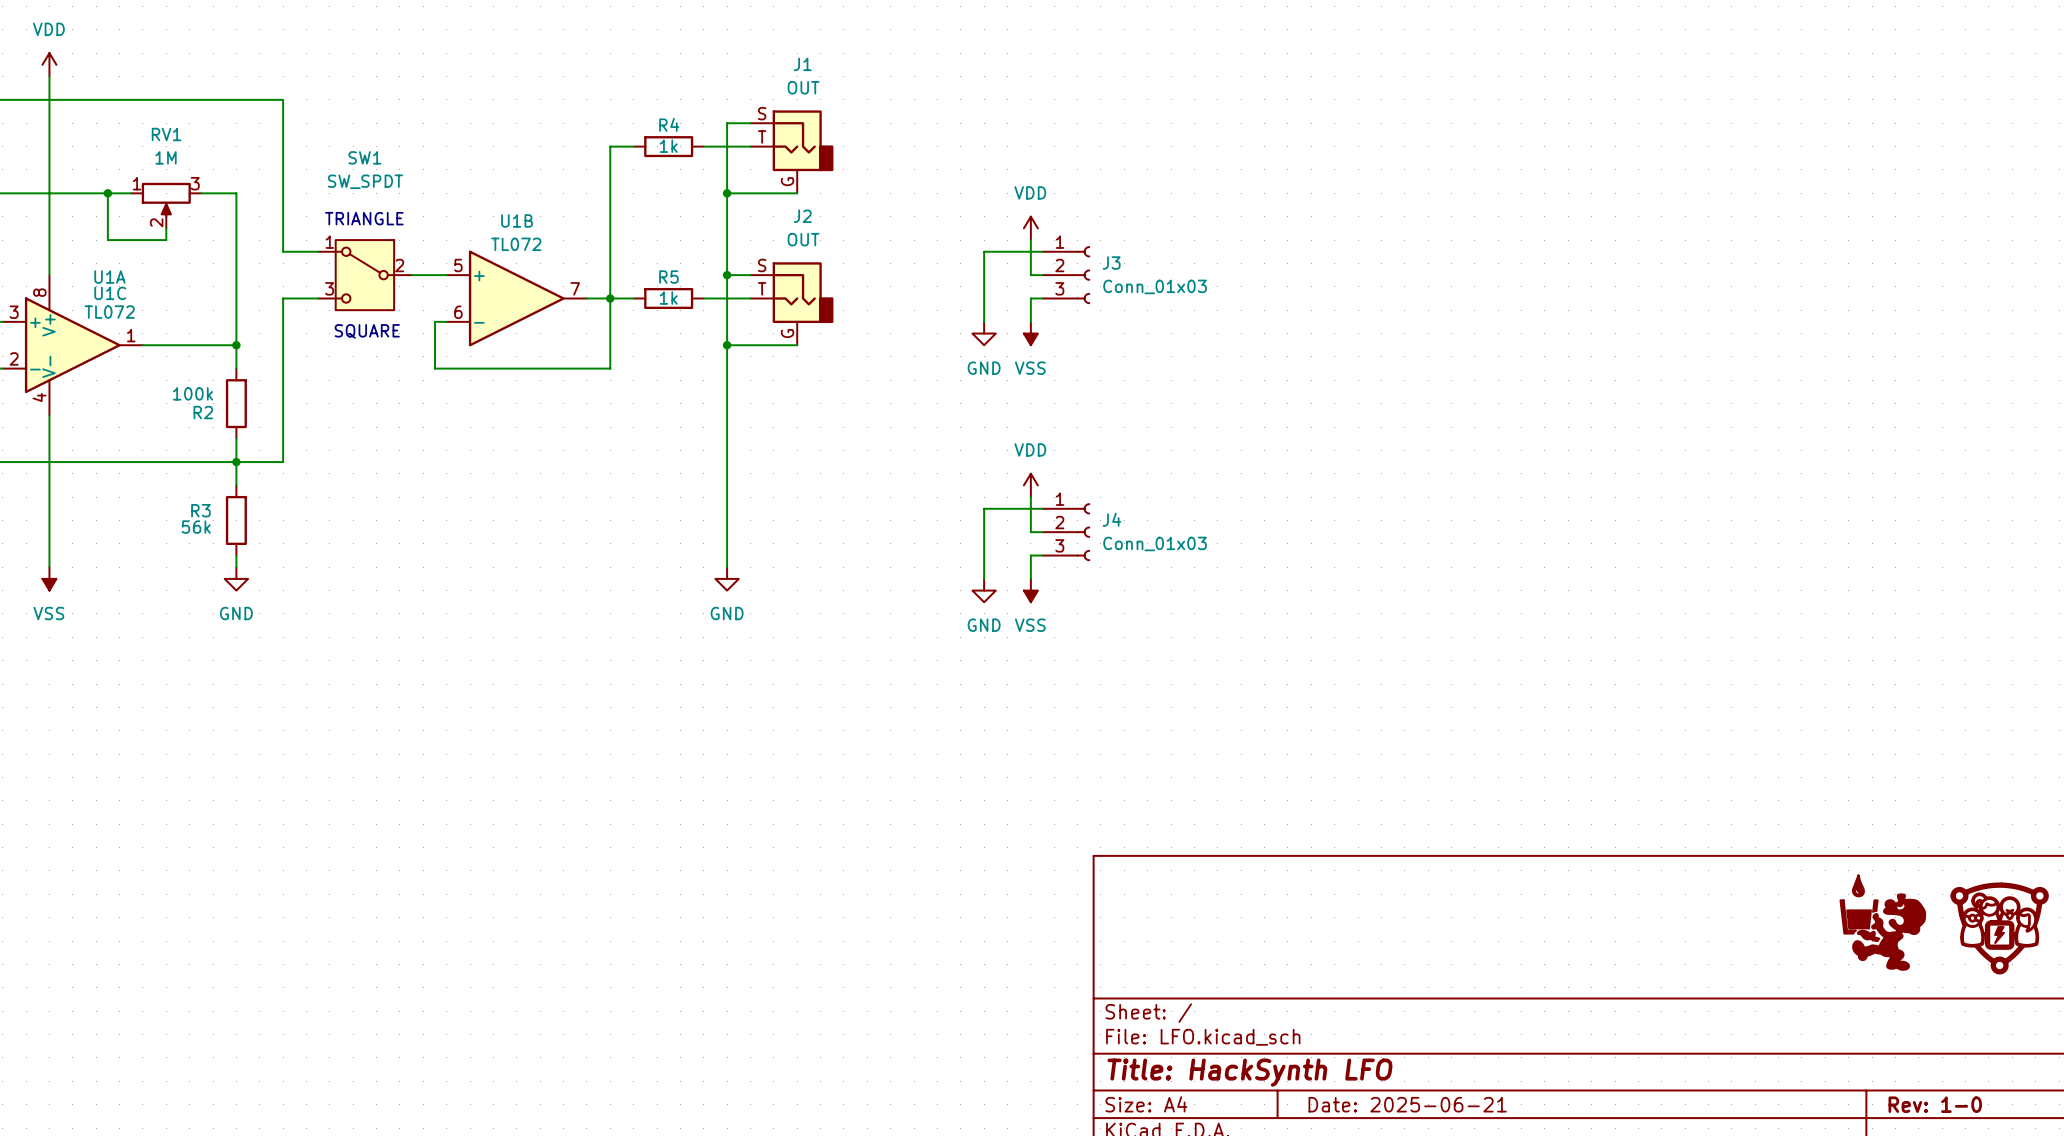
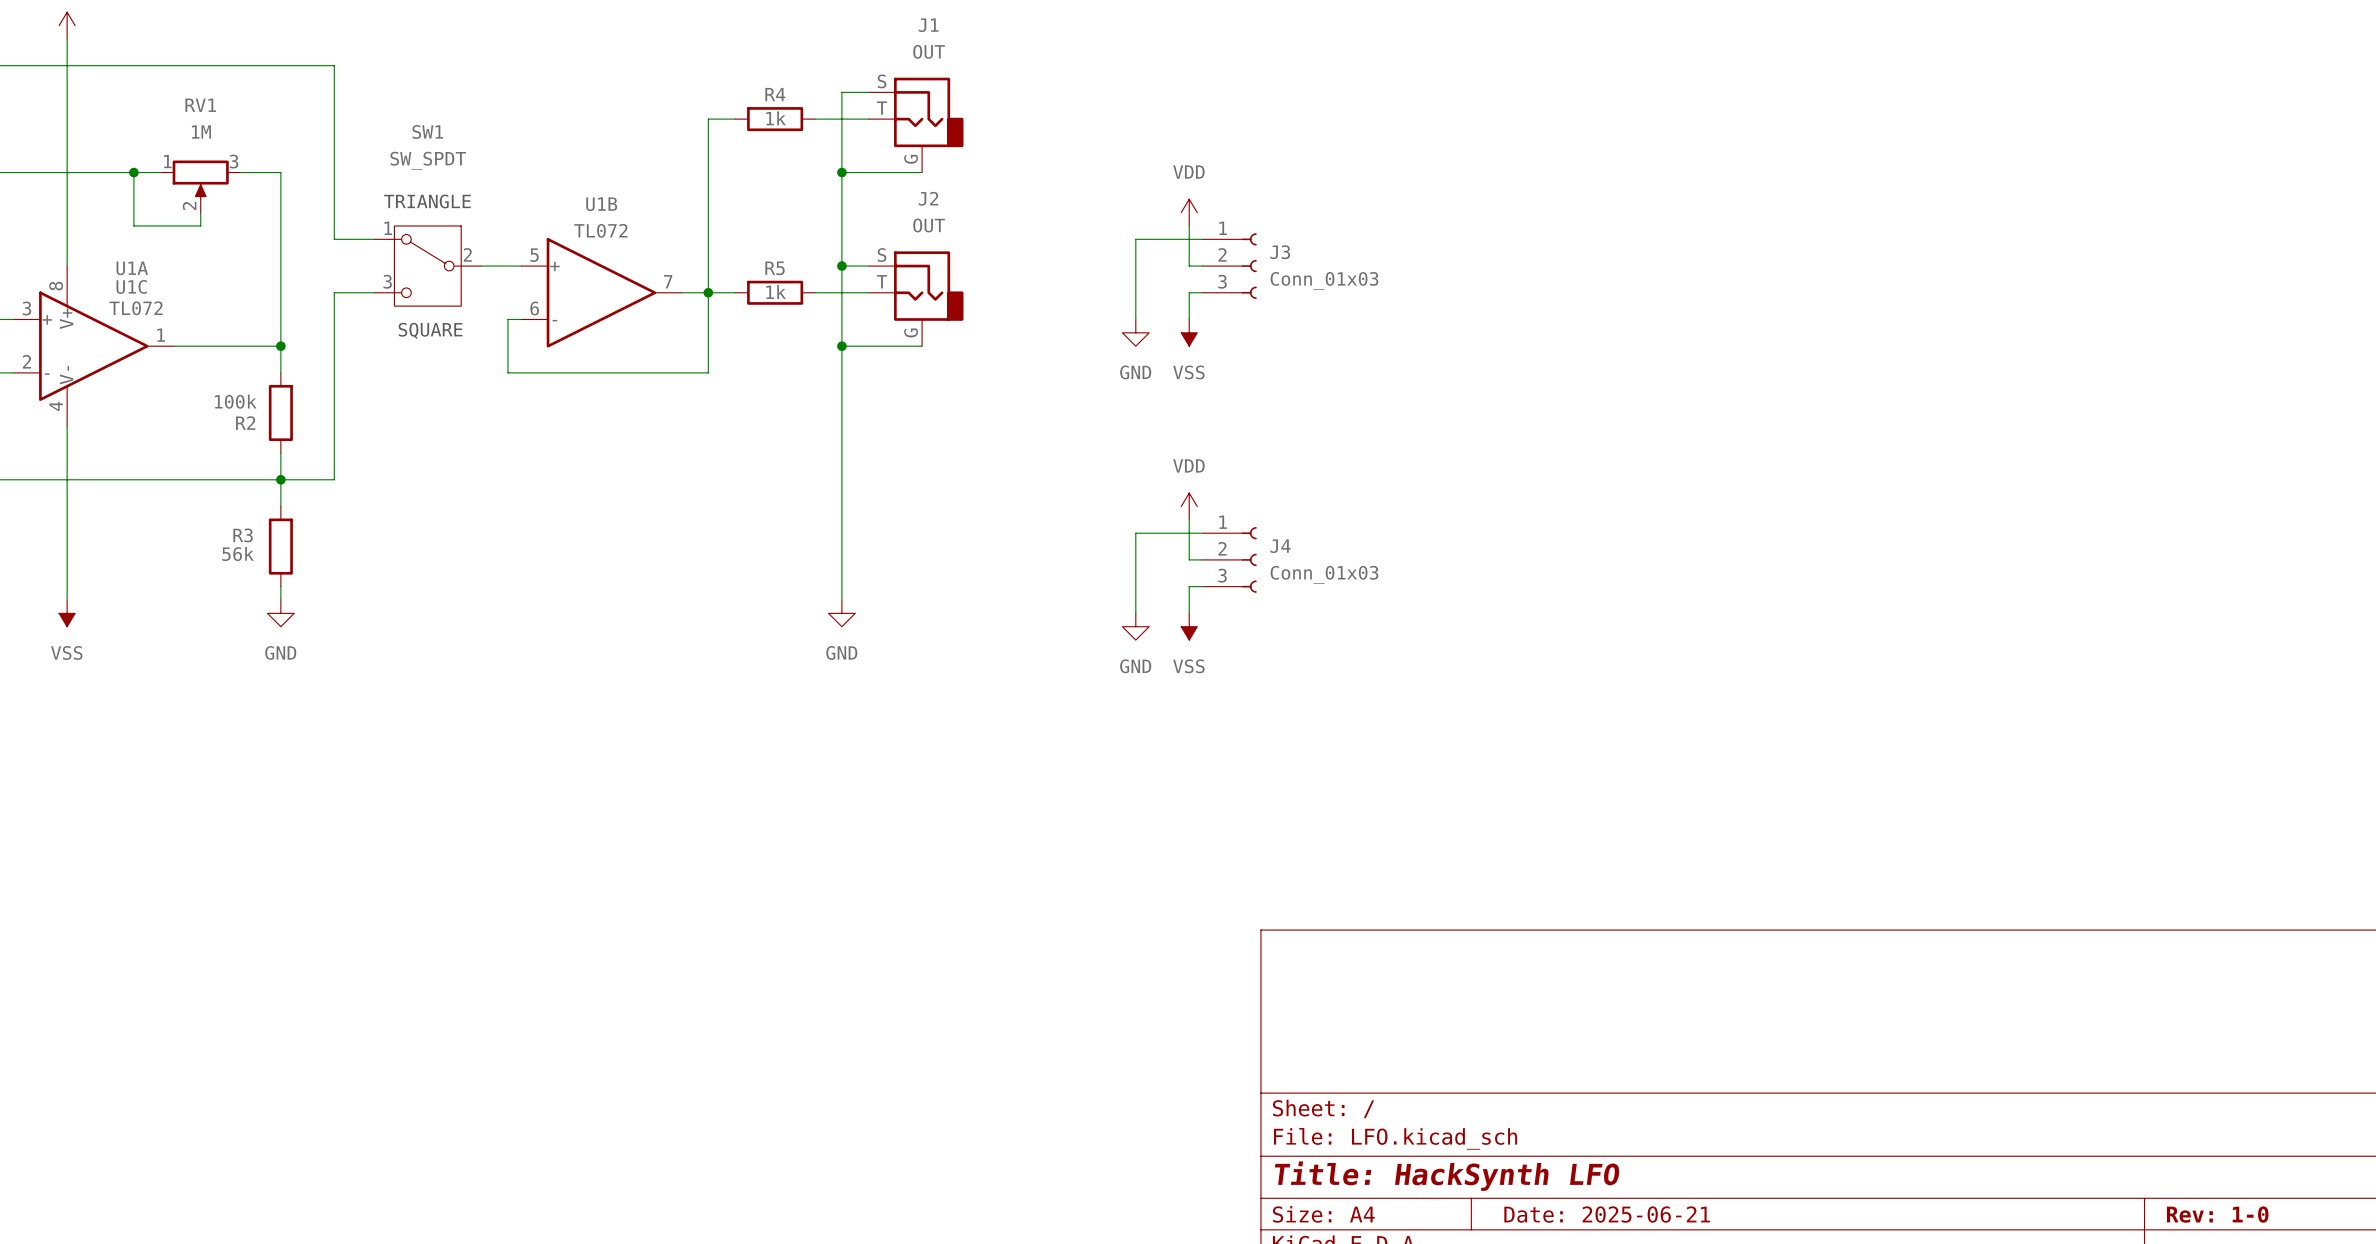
part: (1882, 922) -> none
part: (1999, 928) -> none

